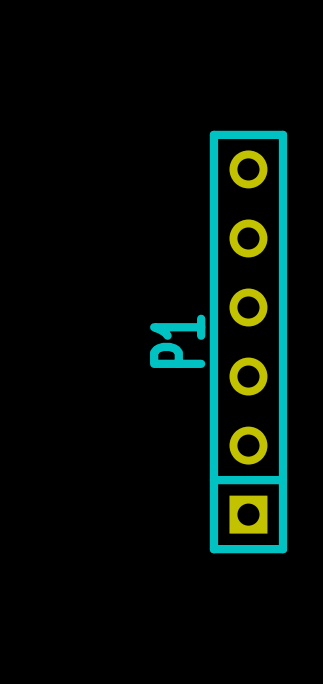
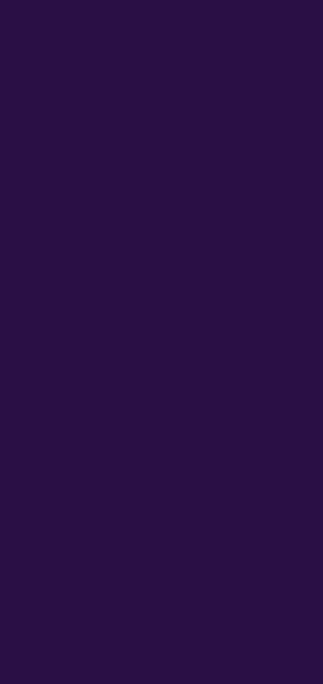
P1: (248, 342) -> none

